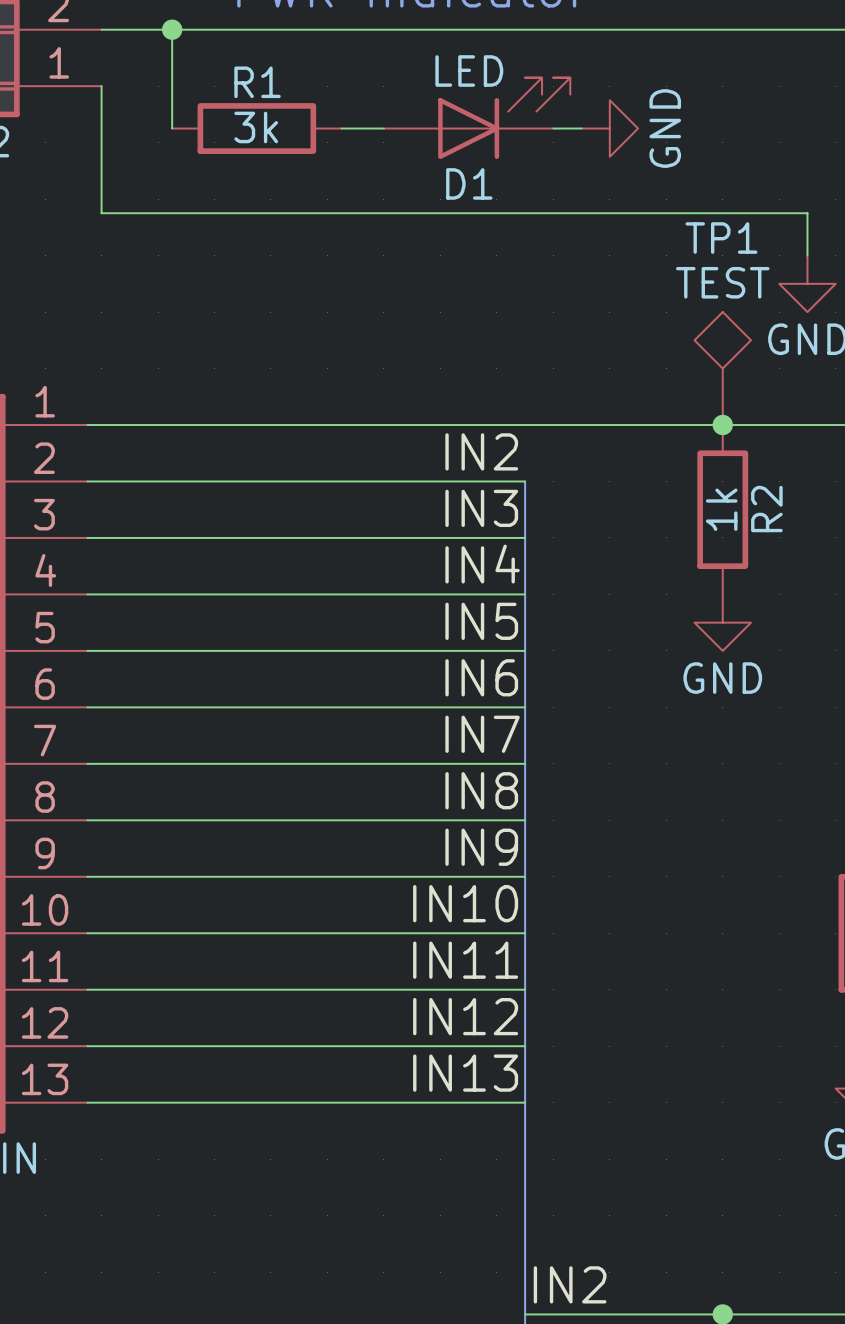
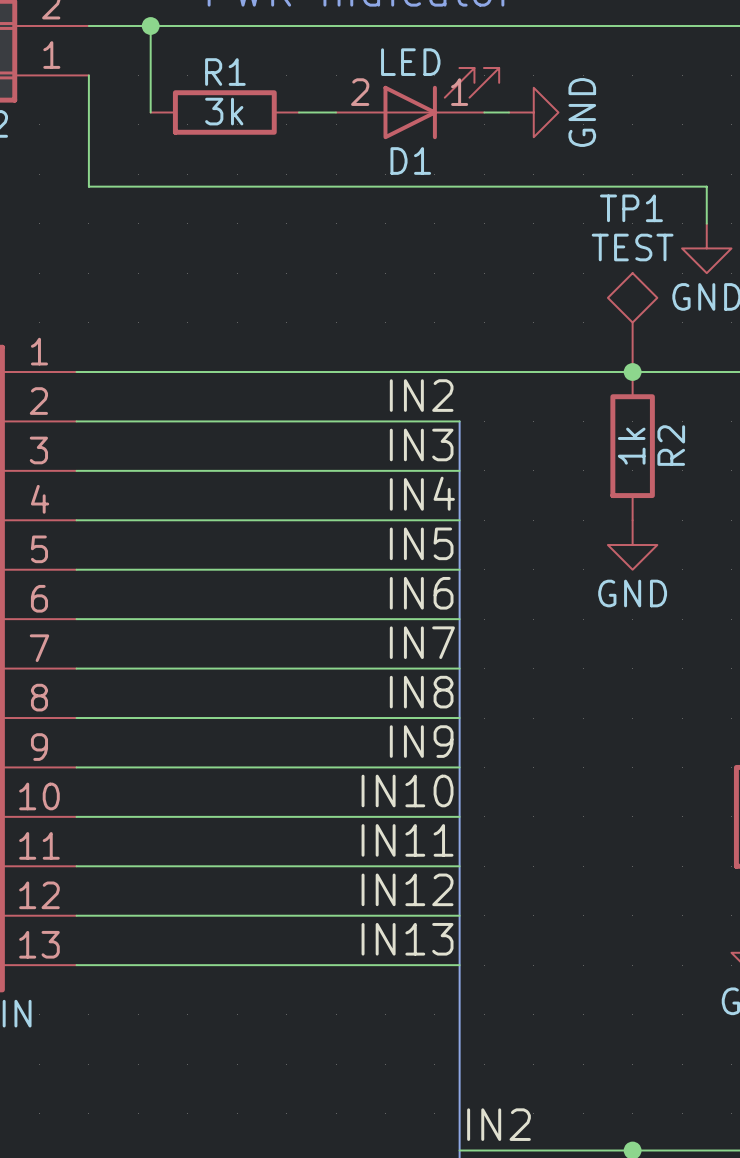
D1 pin number: none -> 2 (360, 92)
D1 pin number: none -> 1 (459, 92)

